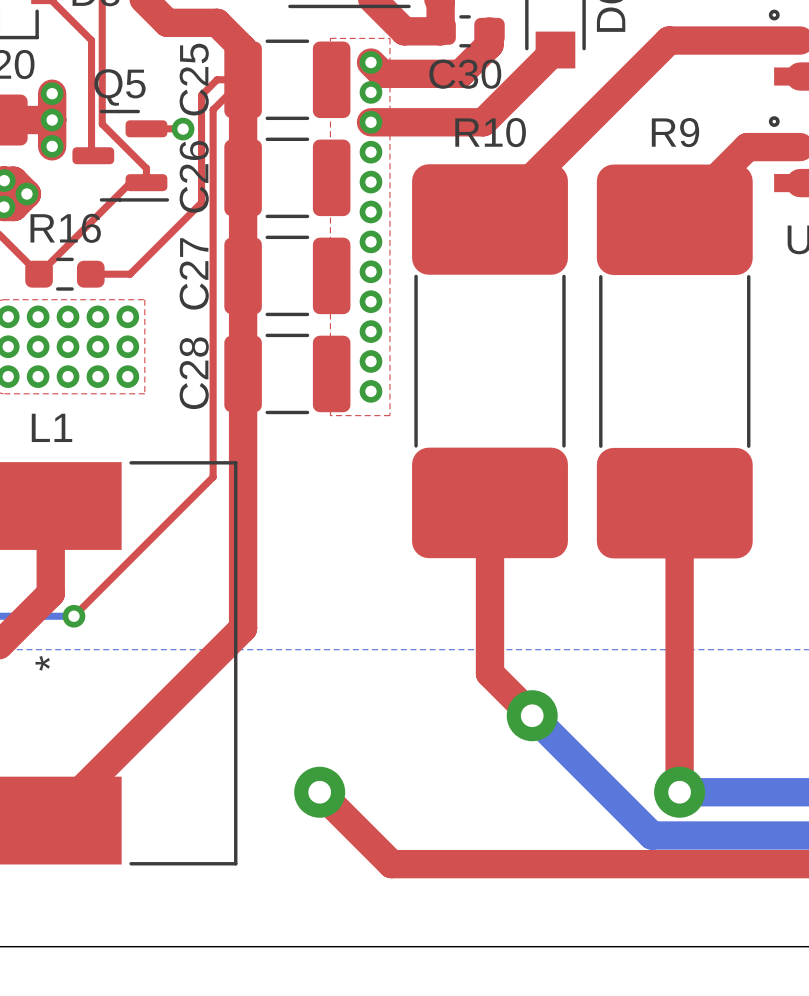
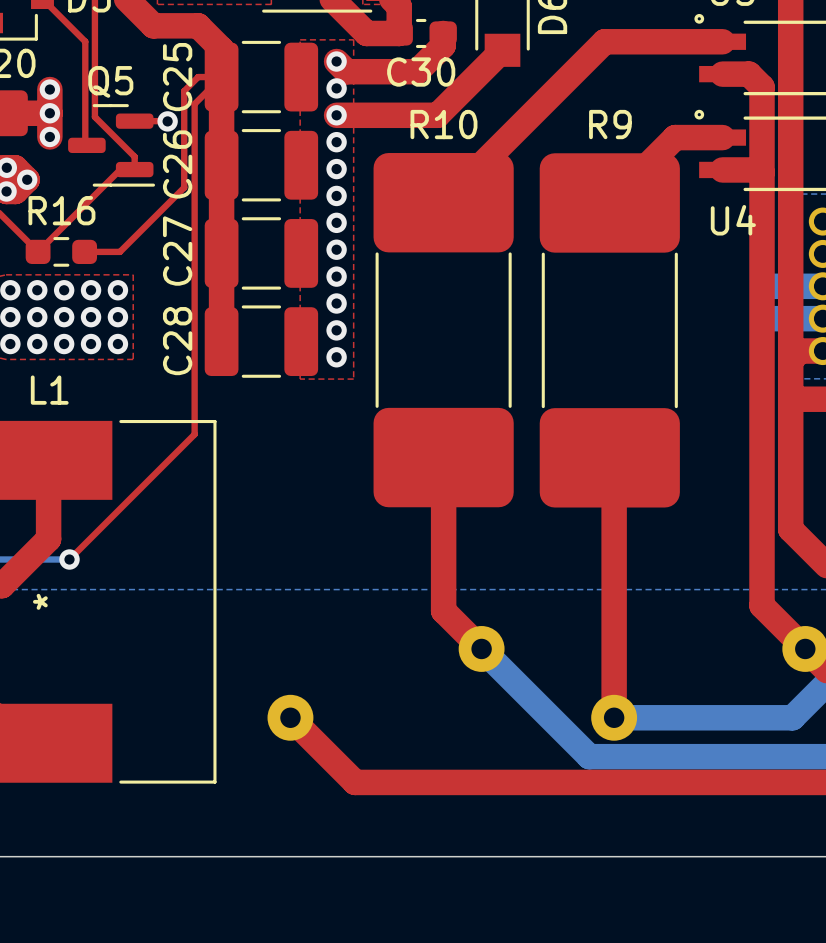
top track: (243, 373) (243, 628) (50, 820) -> none

